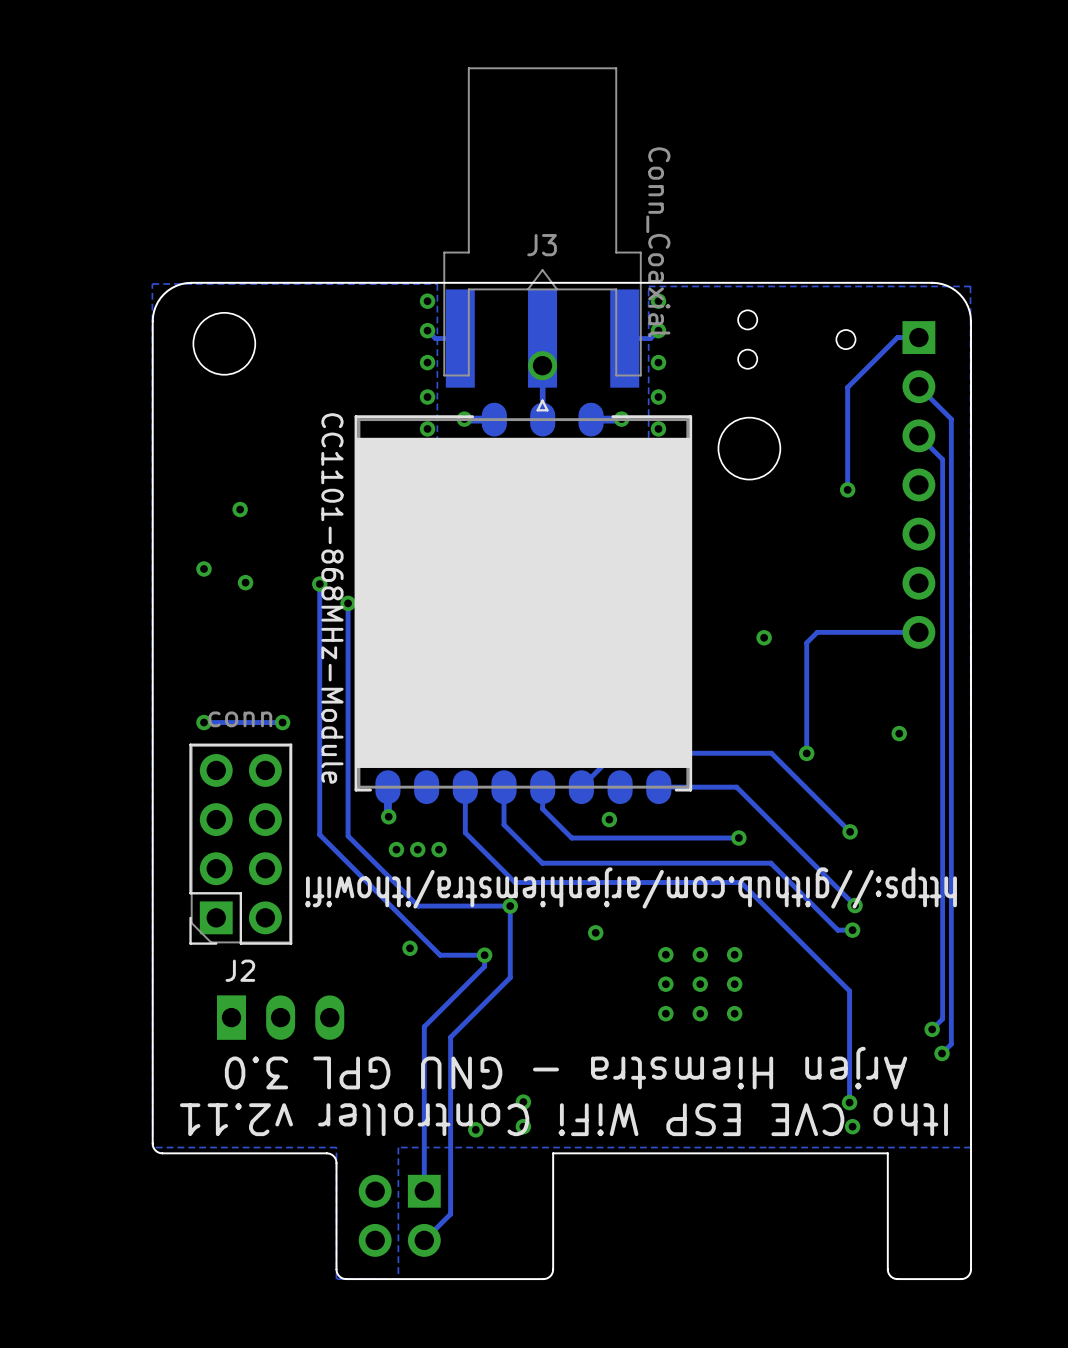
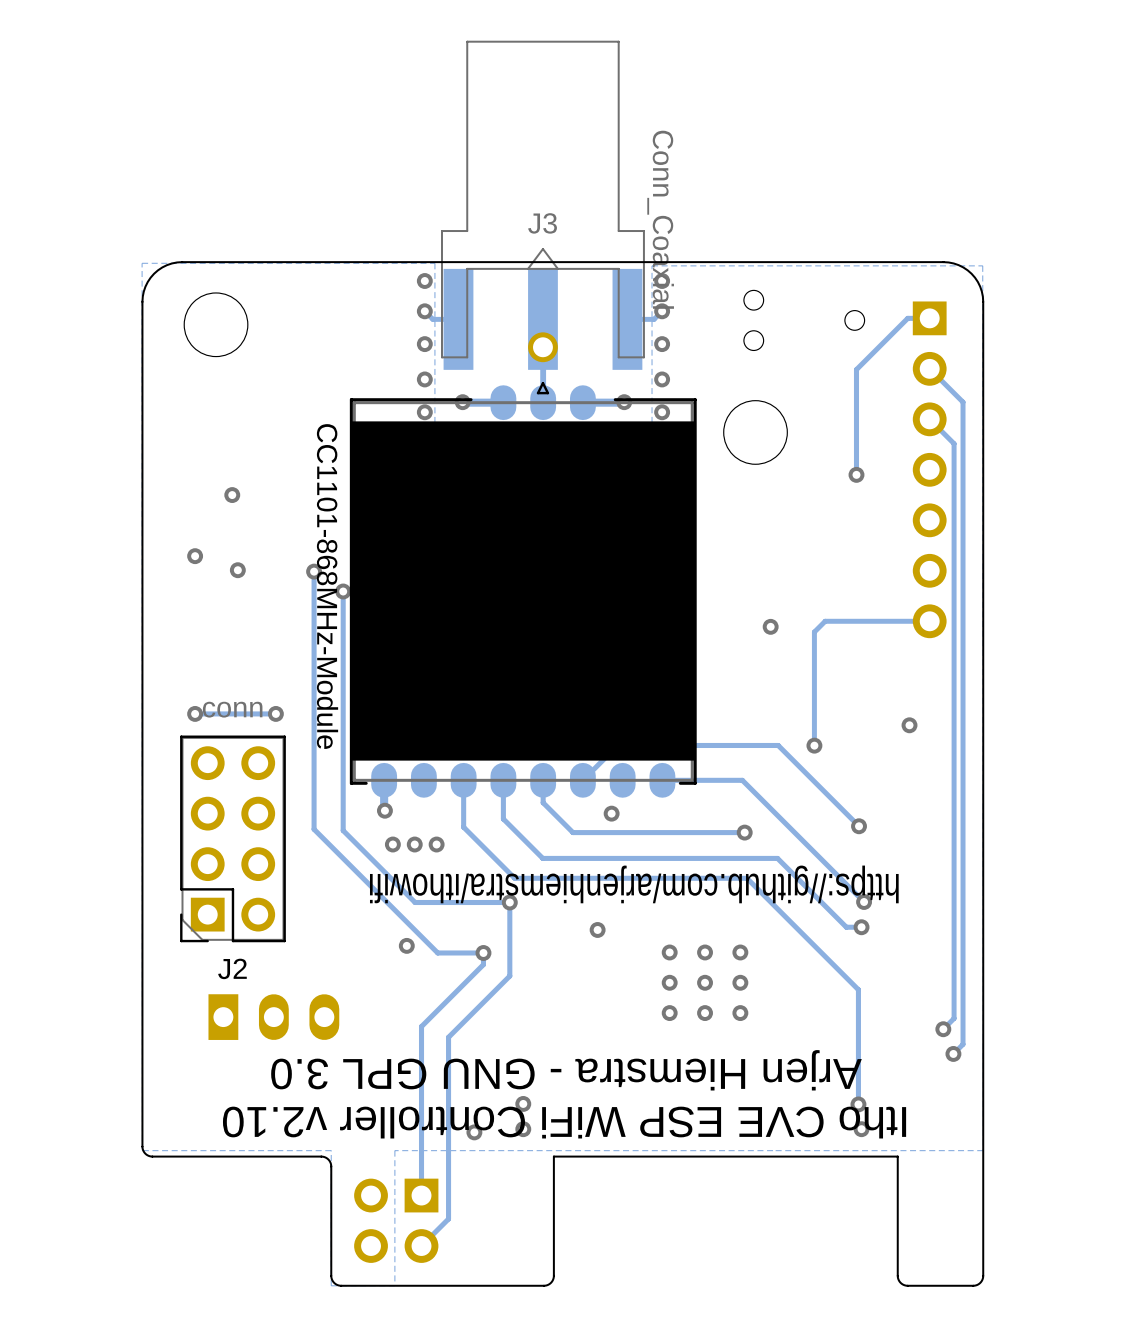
part footprint: [354, 402, 693, 805] -> [349, 385, 697, 798]
text: Itho CVE ESP WiFi Controller v2.11 (563, 1119) -> Itho CVE ESP WiFi Controller v2.10 (564, 1122)

